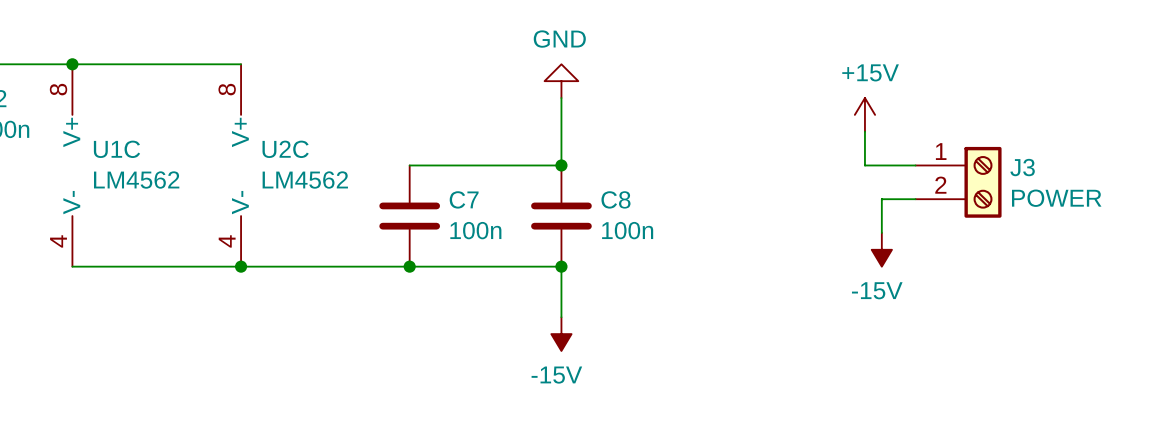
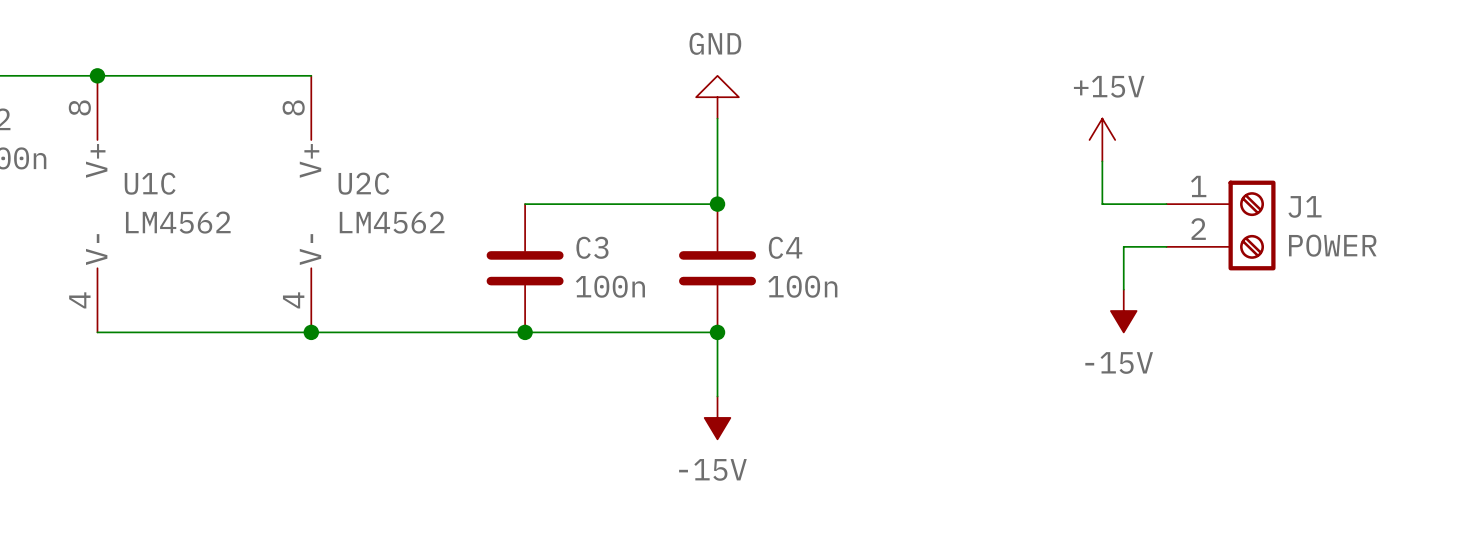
J3 name: J3 (1022, 167) -> J1 (1305, 206)
C7 name: C7 (464, 199) -> C3 (592, 247)
C8 name: C8 (615, 199) -> C4 (785, 247)

